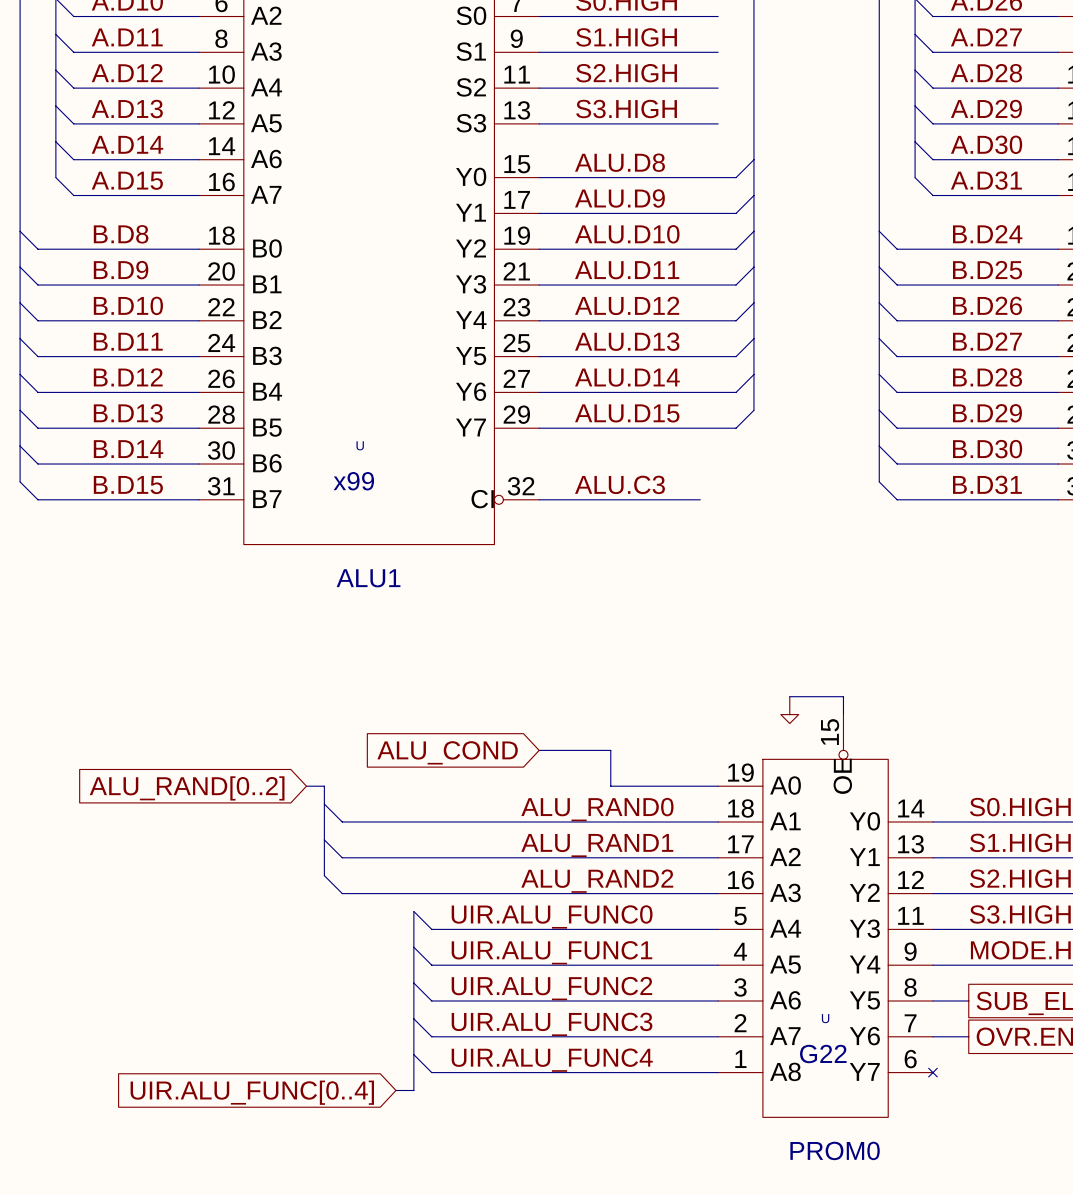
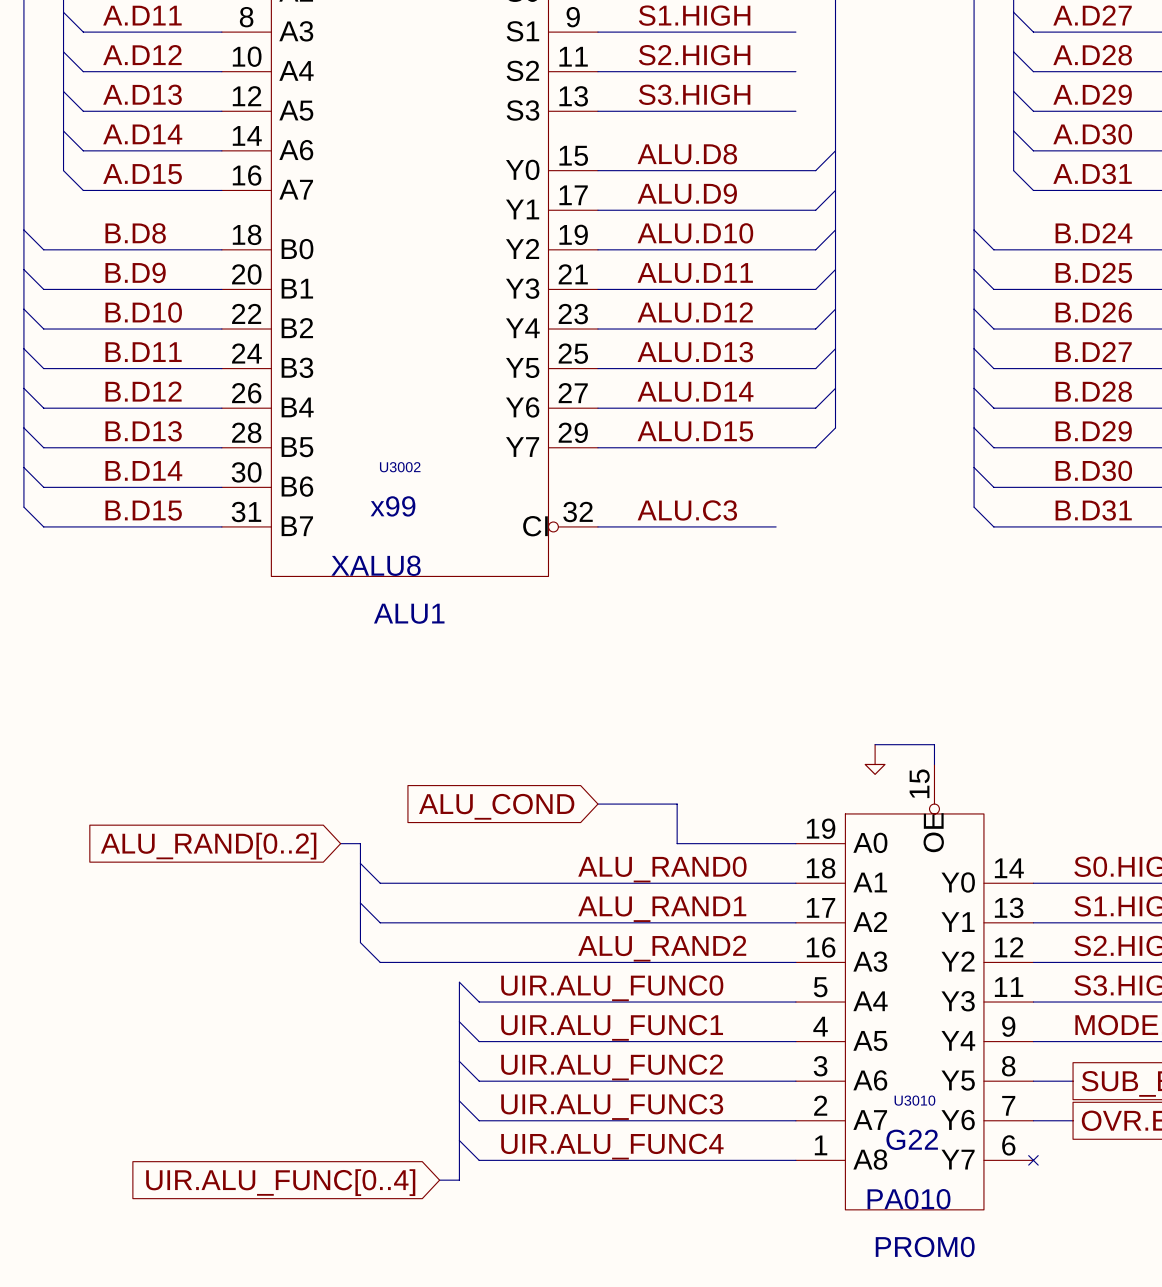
U name: U (360, 445) -> U3002 (400, 467)
U value: none -> XALU8 (376, 565)
U name: U (825, 1018) -> U3010 (914, 1100)
U value: none -> PA010 (909, 1199)

